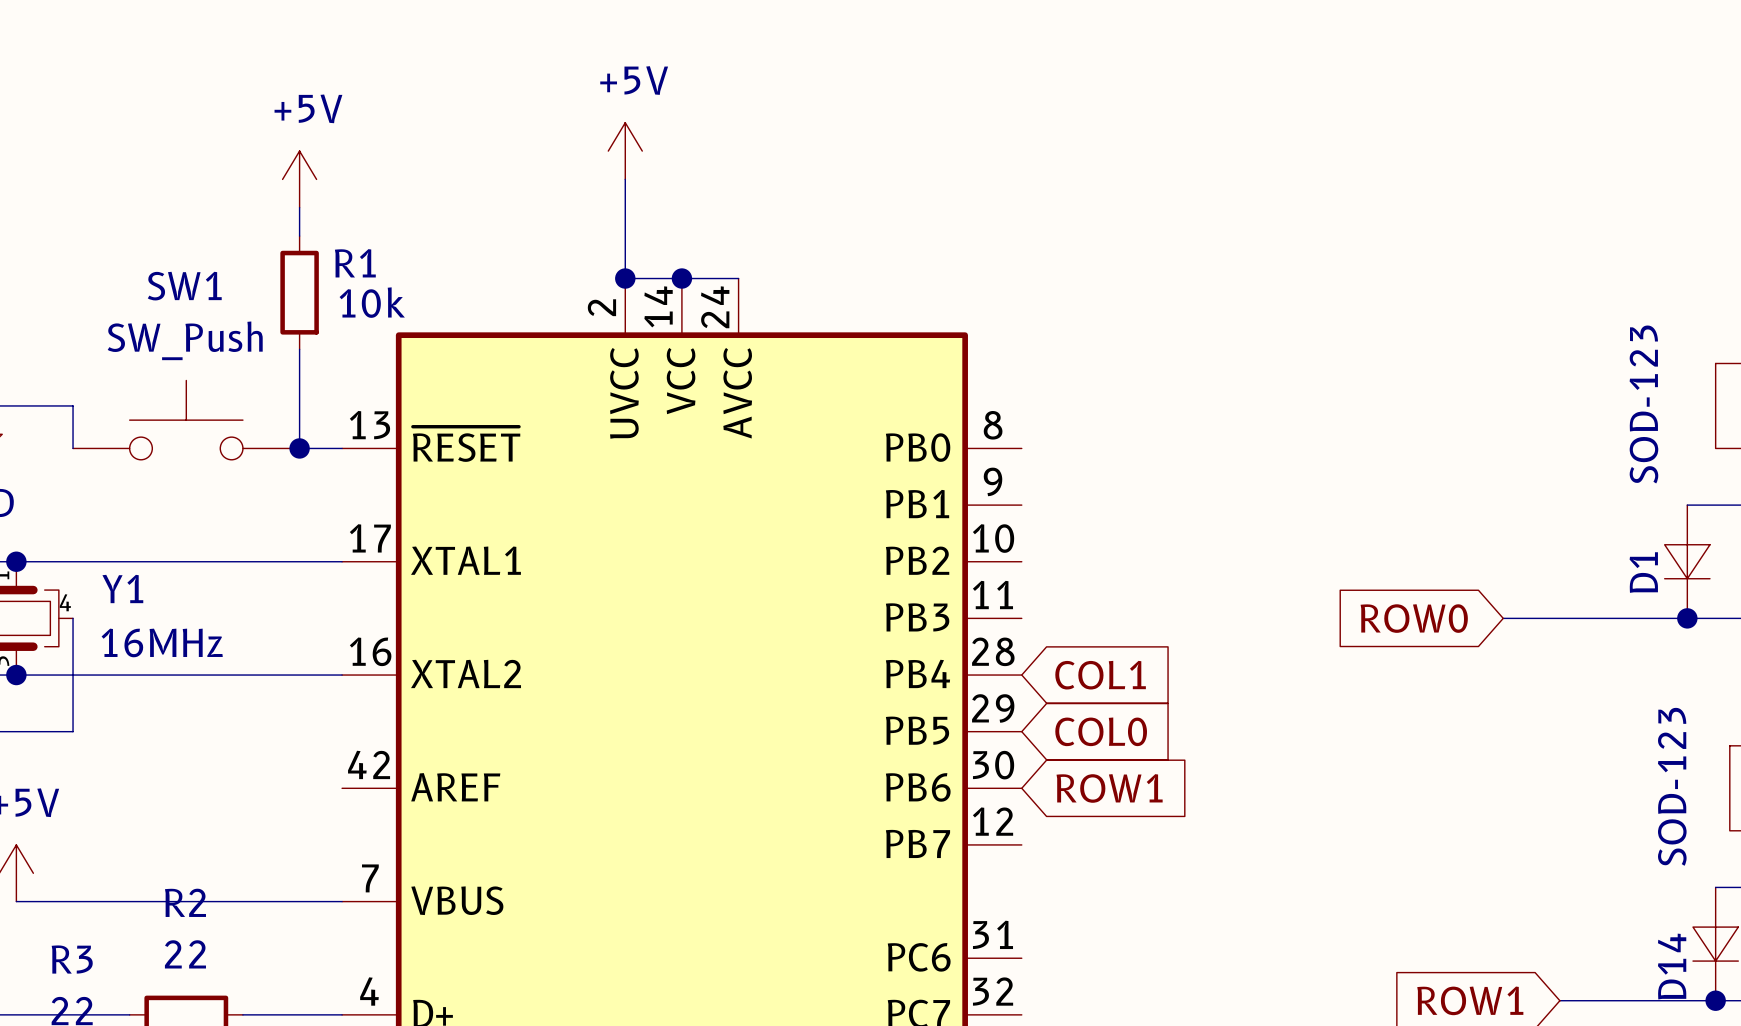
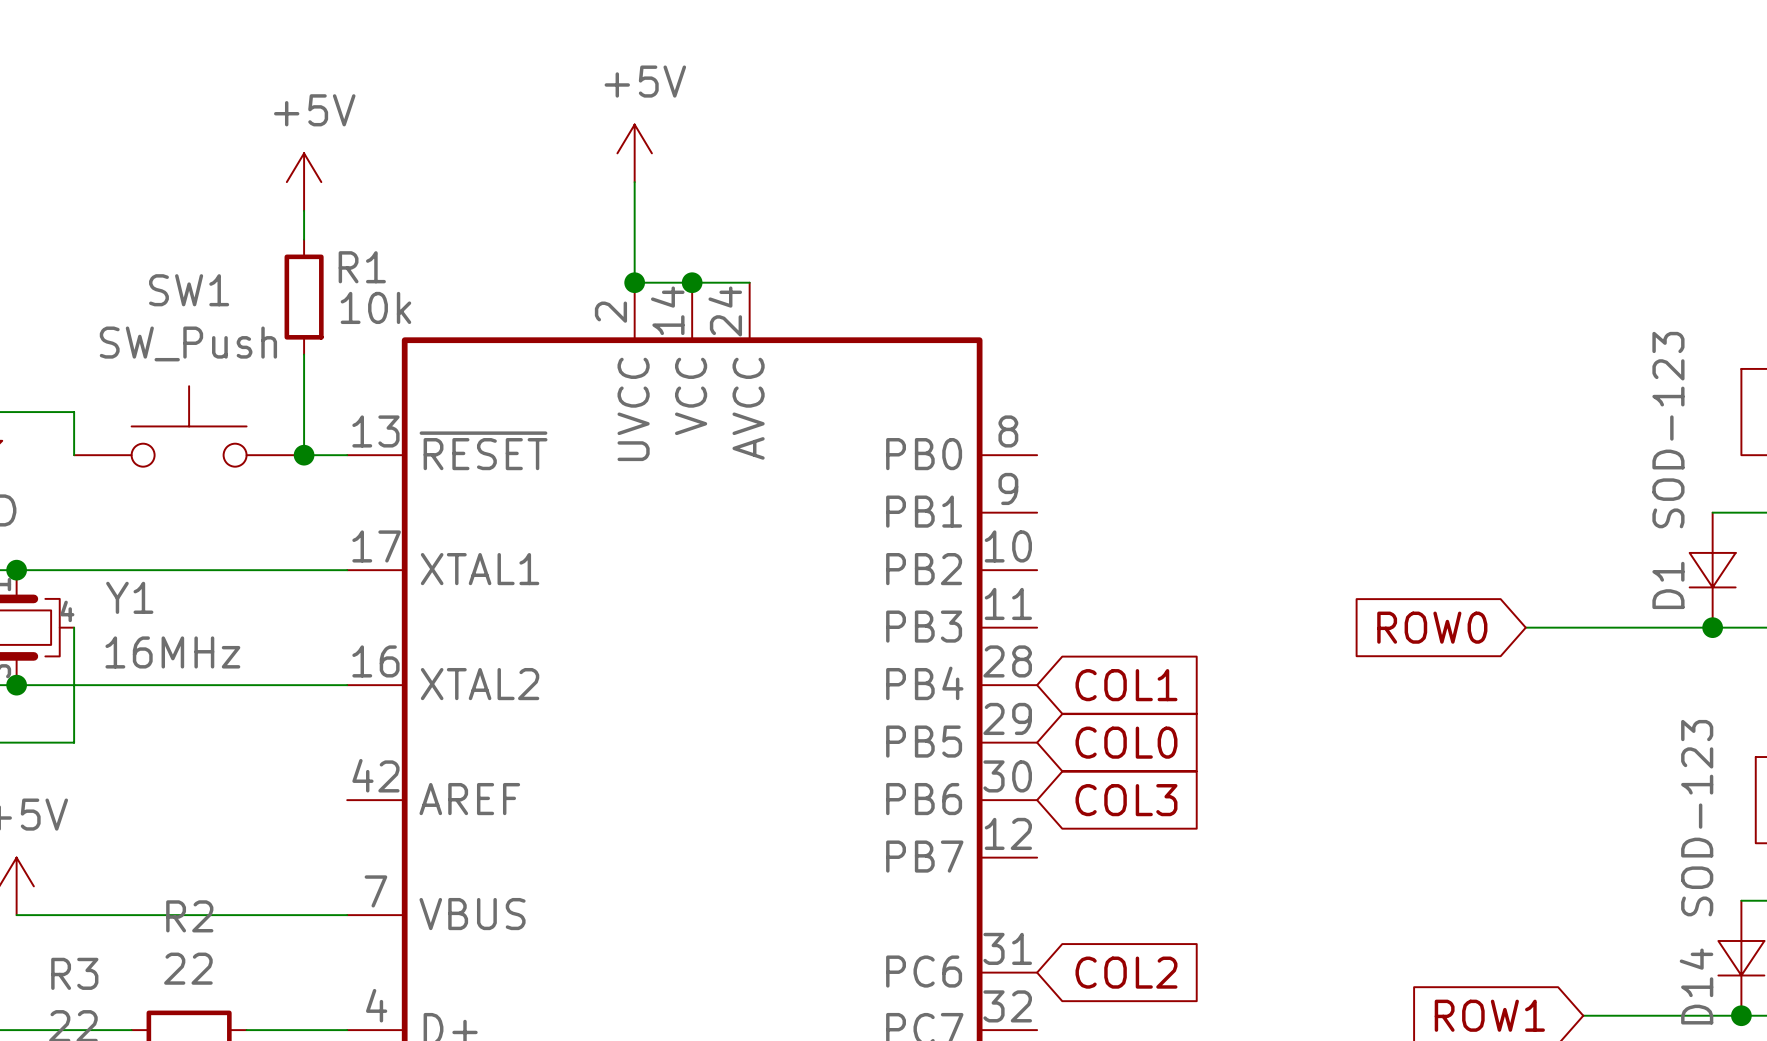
global label: ROW1 (1109, 788) -> COL3 (1126, 800)
global label: none -> COL2 (1126, 972)

